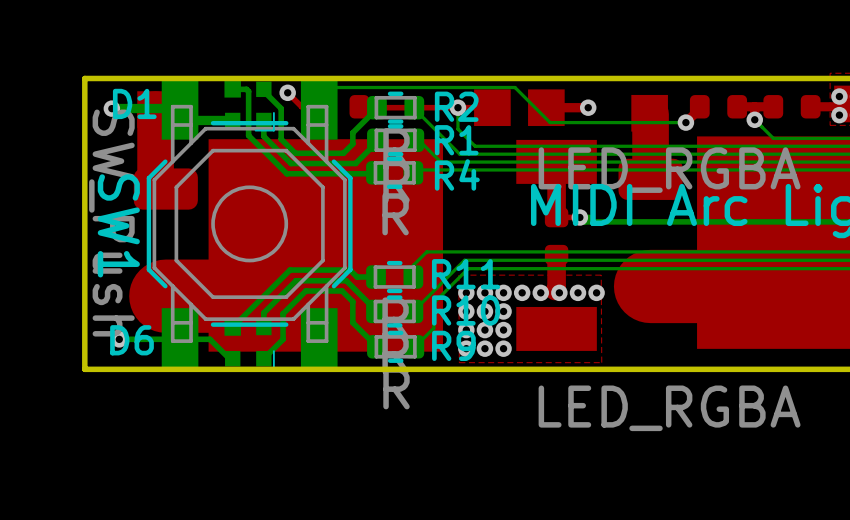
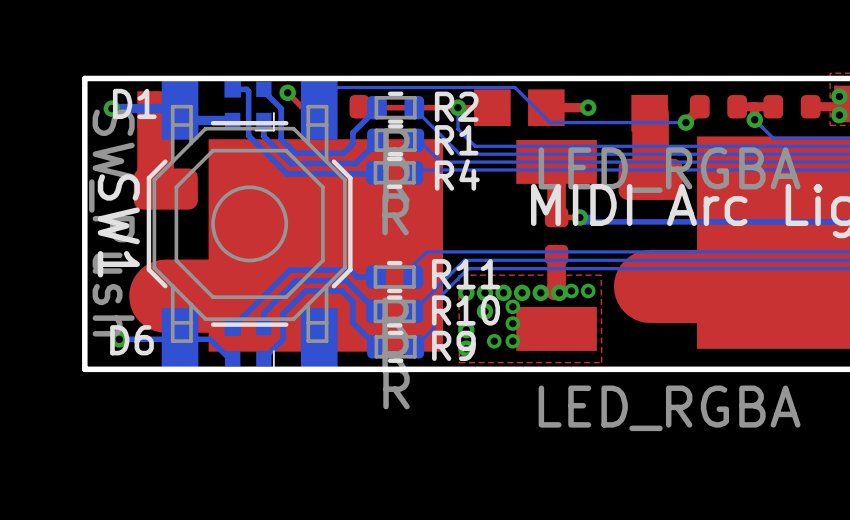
via: none -> (571, 290)
via: none -> (588, 290)
via: (577, 292) -> none
via: (596, 292) -> none
via: none -> (512, 306)
via: (466, 311) -> none
via: (503, 311) -> none
via: none -> (512, 323)
via: (484, 330) -> none
via: (503, 330) -> none
via: none -> (494, 341)
via: none -> (512, 341)
via: (484, 348) -> none
via: (503, 348) -> none

